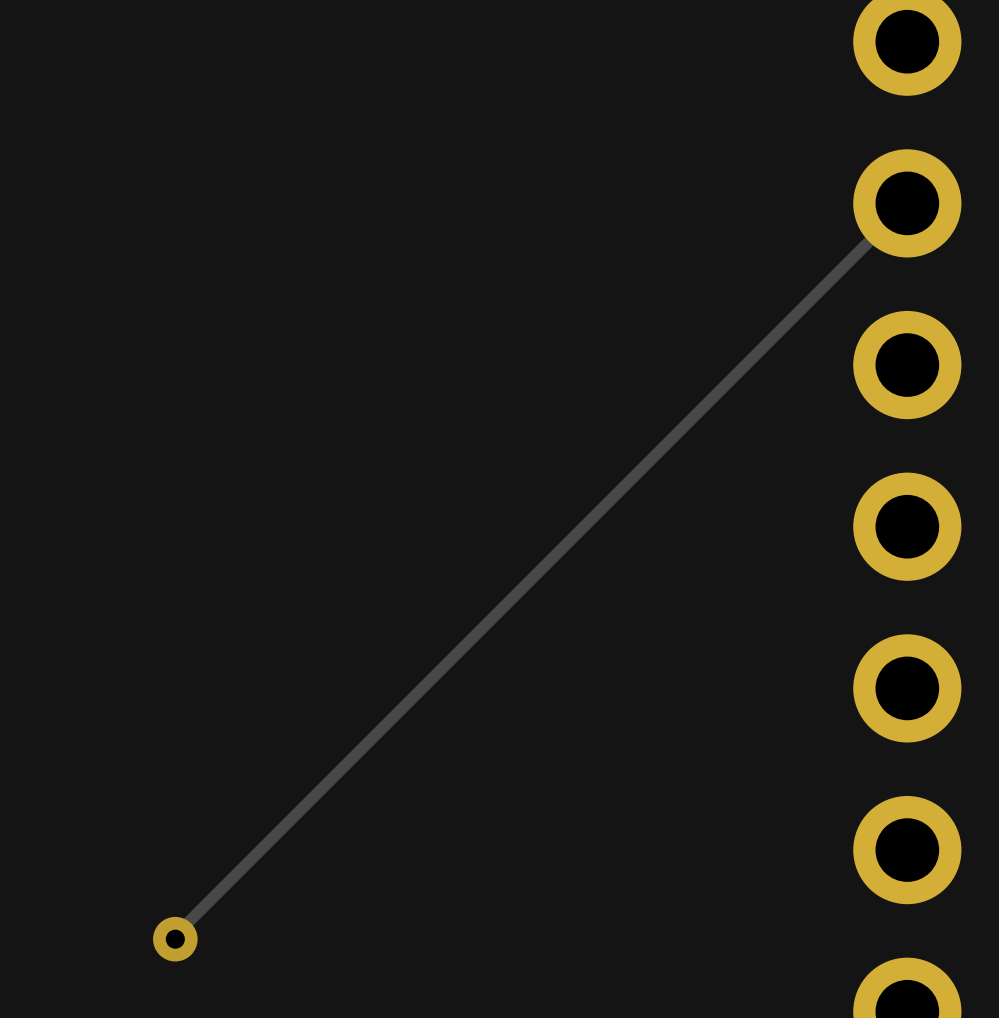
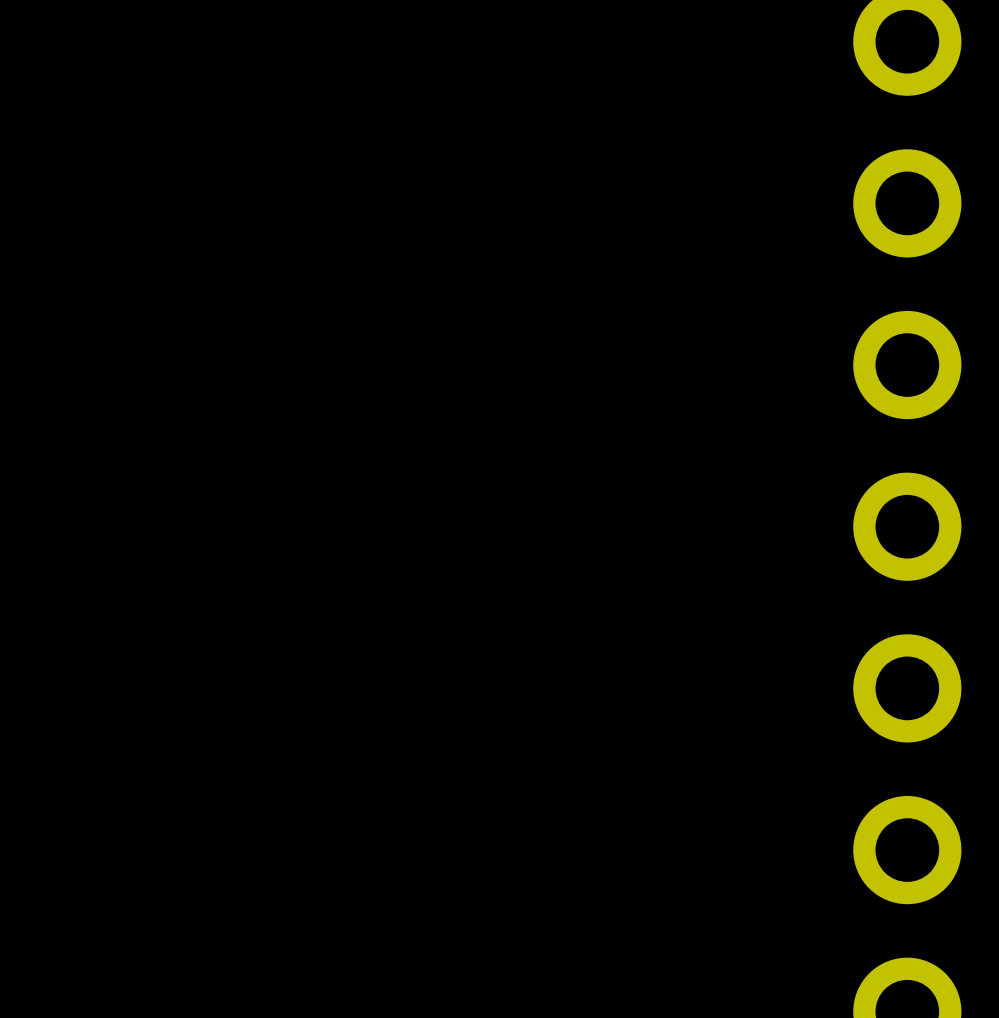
track: (907, 203) (175, 935) (175, 939) -> none
via: (175, 939) -> none

